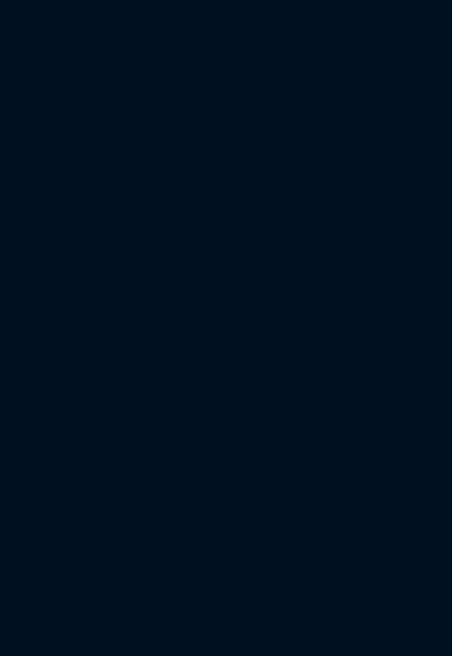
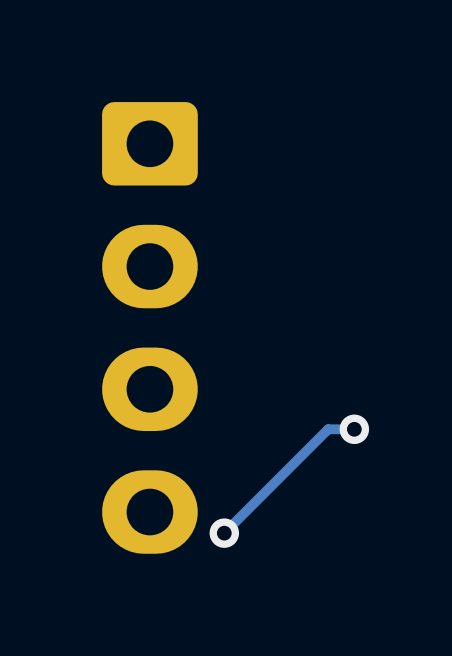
part: none -> (149, 327)
track: none -> (354, 429) (328, 429) (224, 533)
via: none -> (354, 429)
via: none -> (224, 533)

